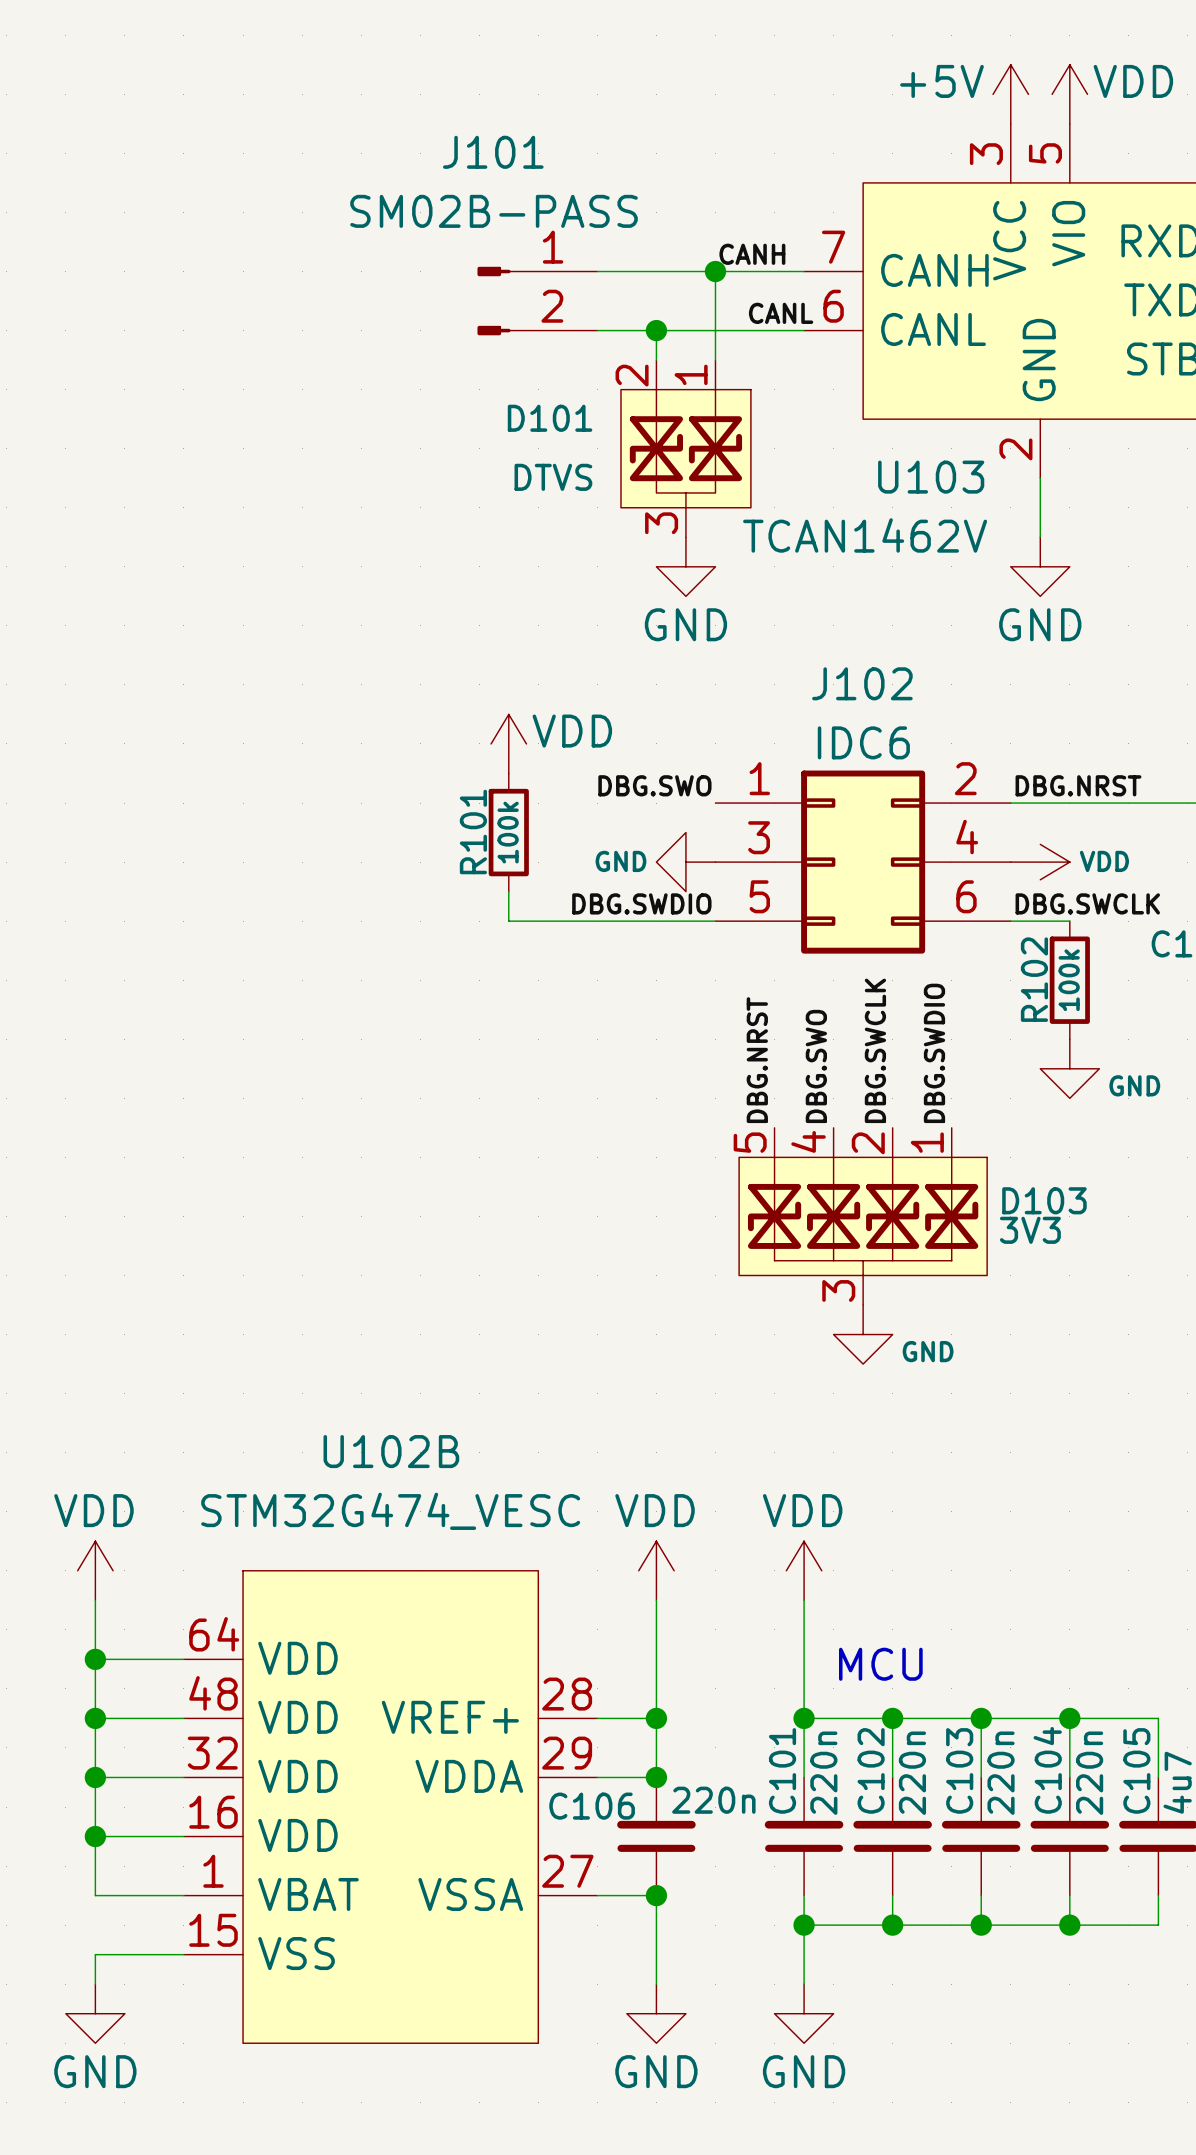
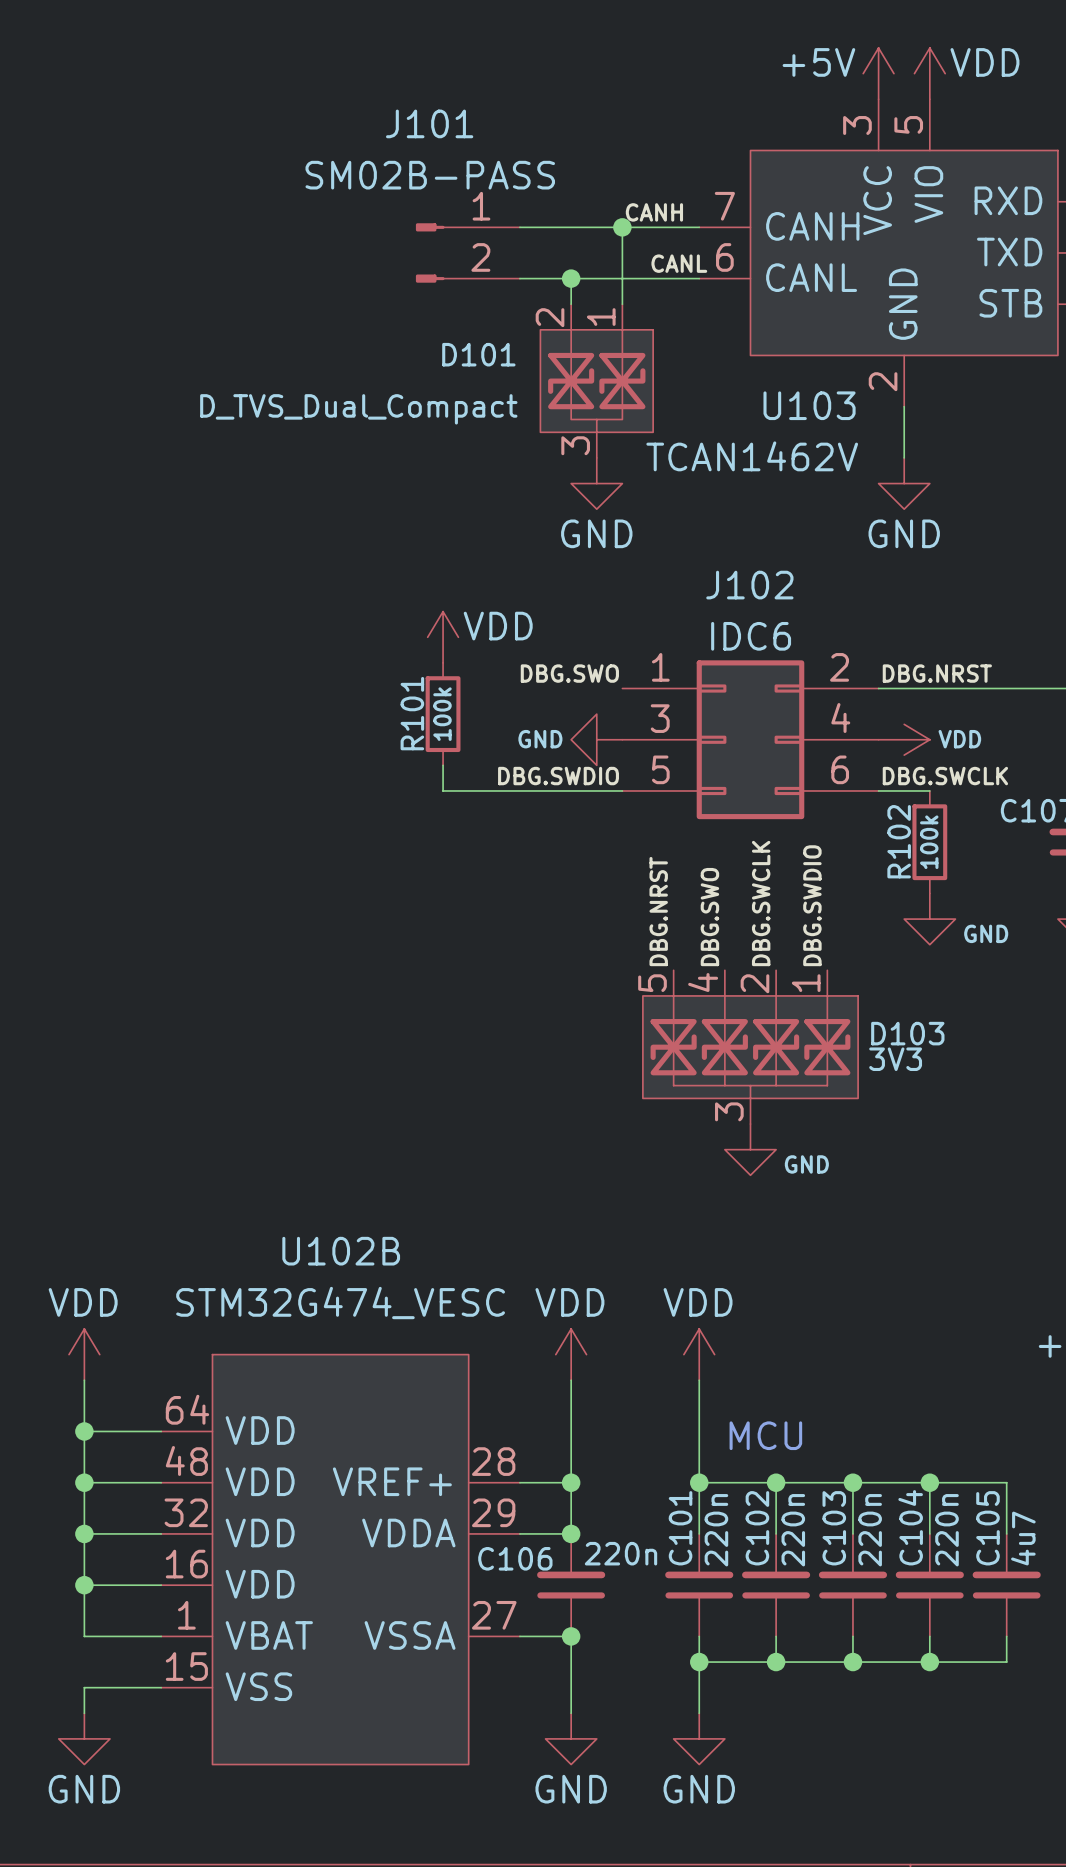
D101 value: DTVS (553, 477) -> D_TVS_Dual_Compact (358, 409)

